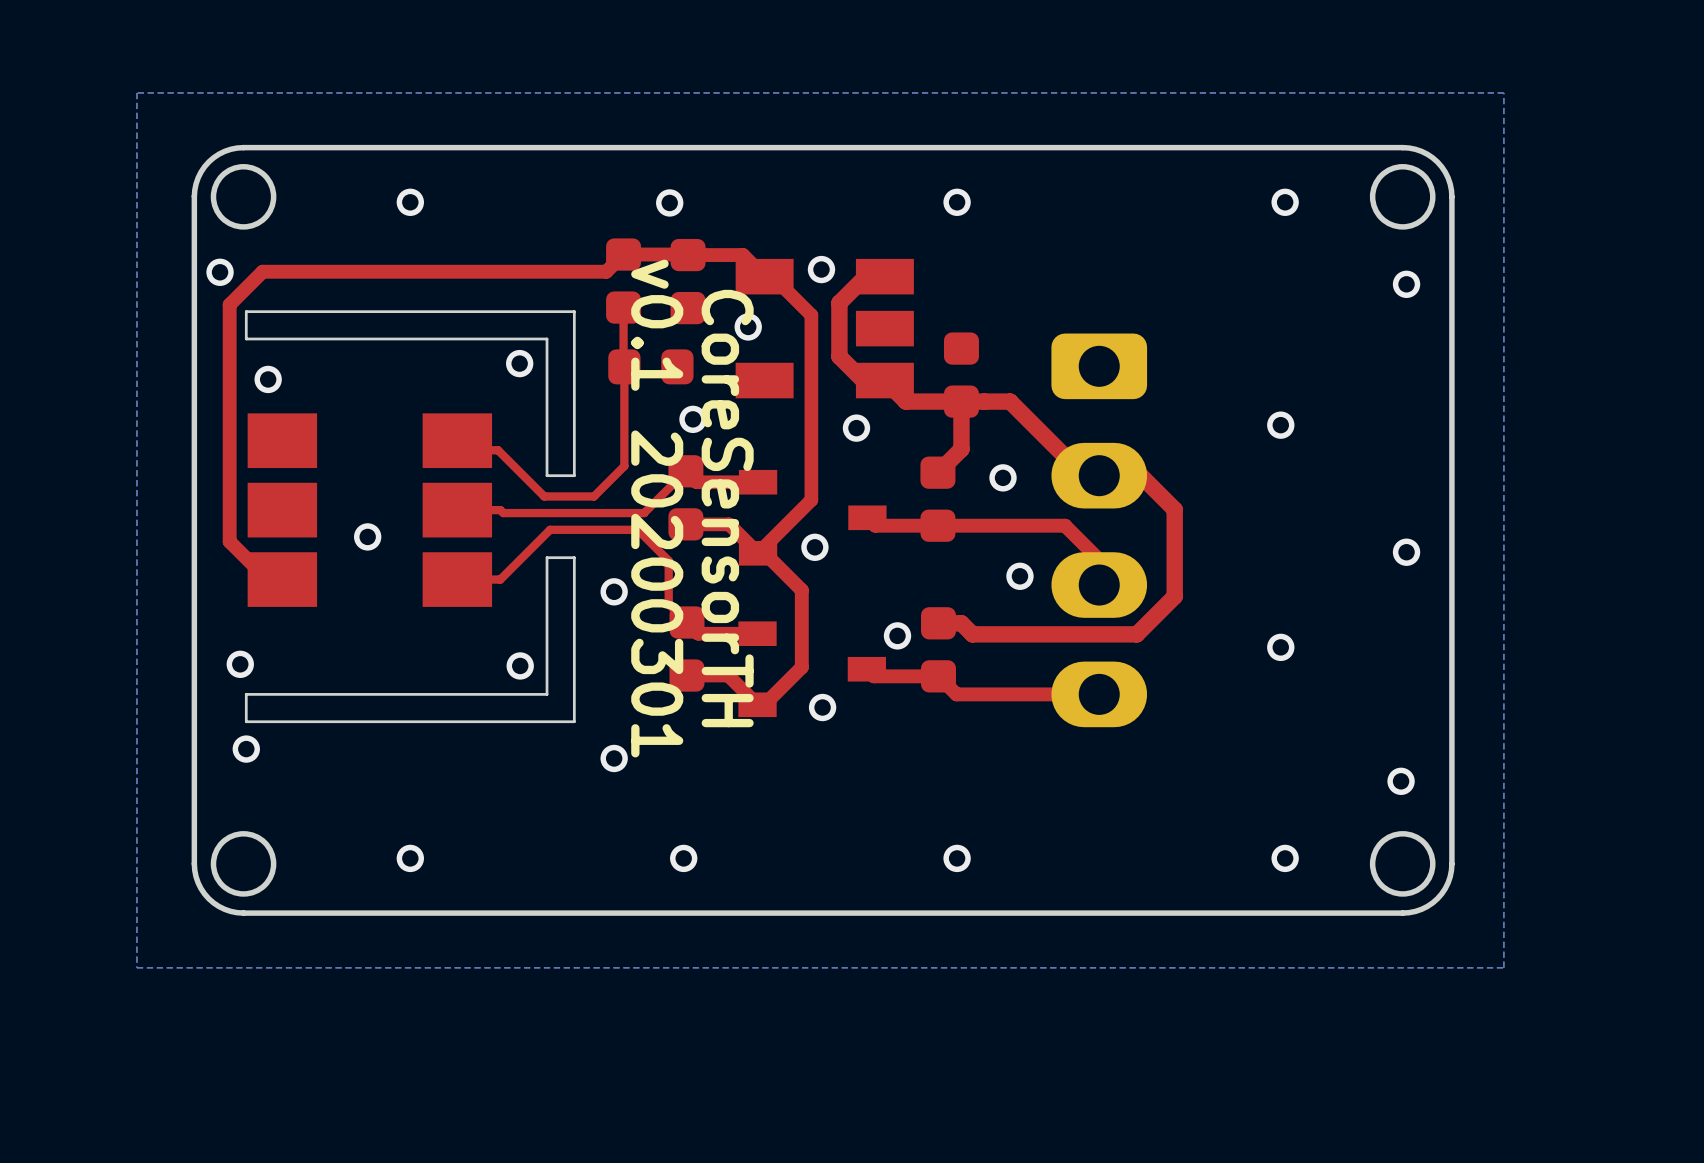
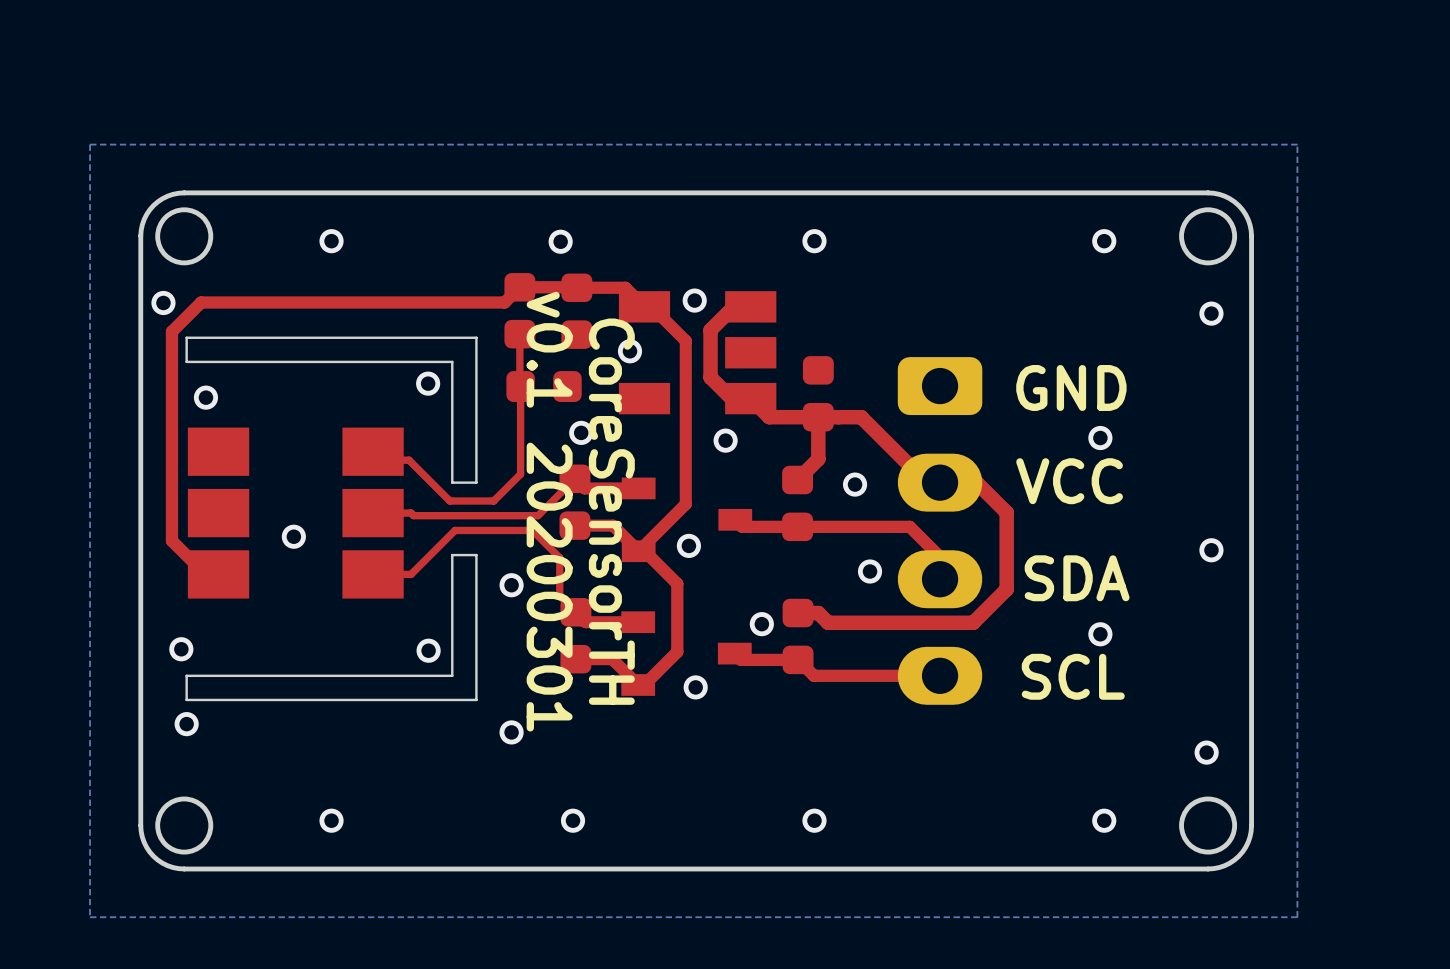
text: none -> GND (1071, 387)
text: none -> VCC (1069, 481)
text: none -> SDA (1077, 578)
text: none -> SCL (1073, 676)

